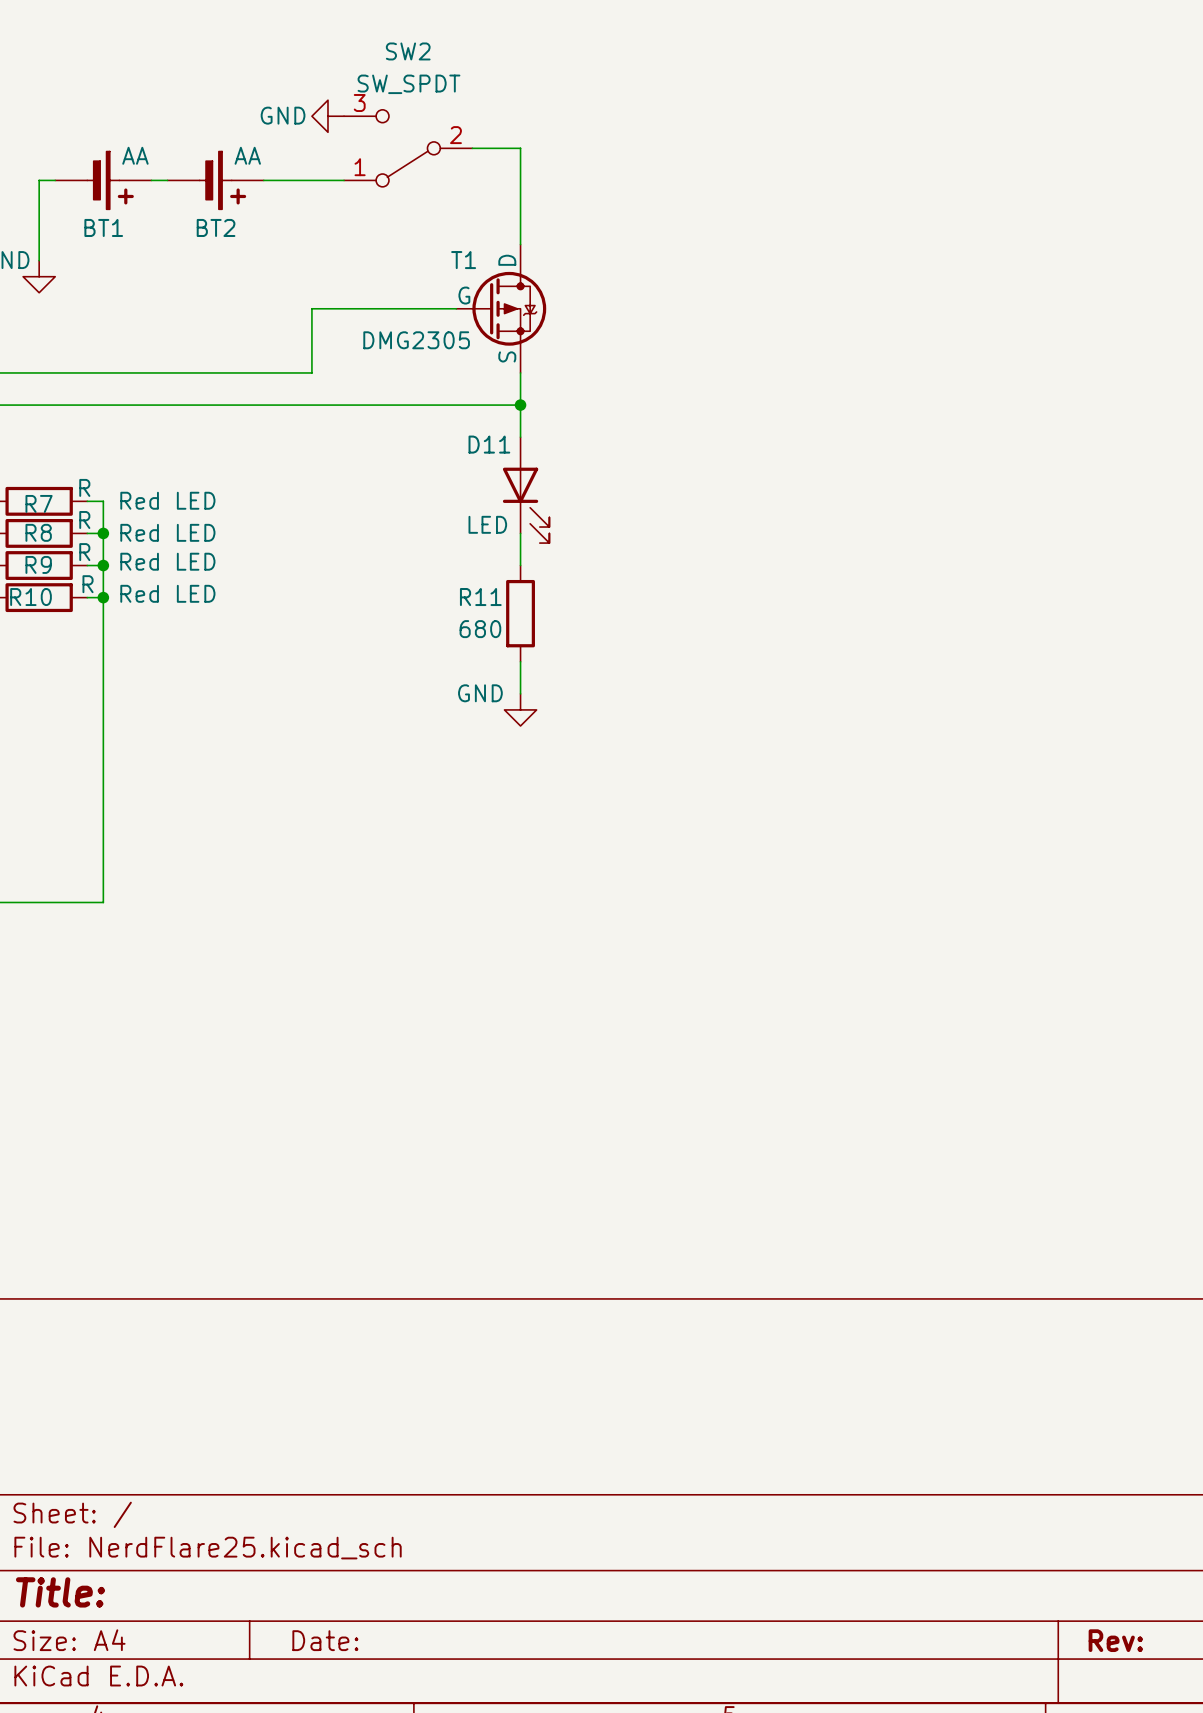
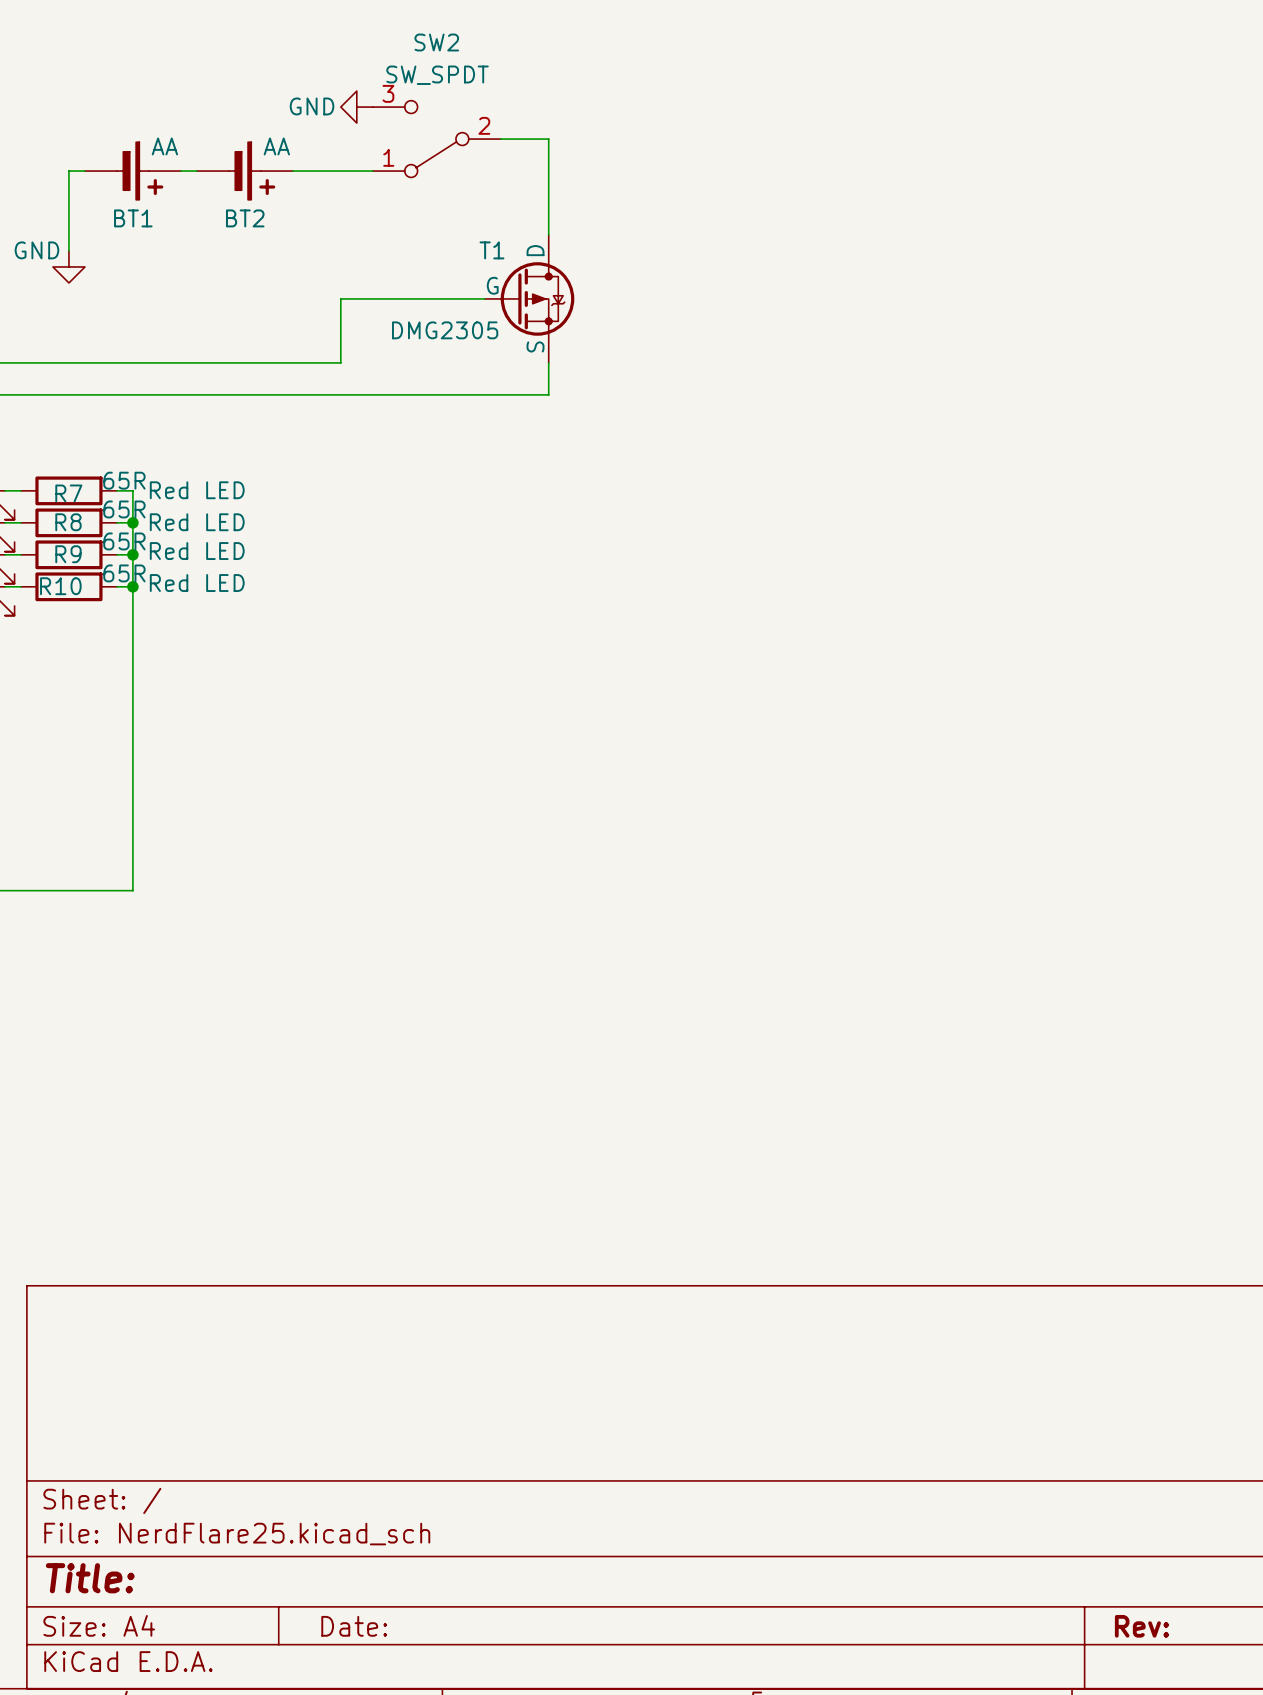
wire: (520, 405) (520, 437) -> none
junction: (520, 405) -> none
R7 value: R (84, 487) -> 65R (124, 480)
D11: LED (526, 490) -> none
R8 value: R (84, 520) -> 65R (124, 509)
wire: (520, 533) (520, 565) -> none
R9 value: R (84, 552) -> 65R (124, 541)
R10 value: R (88, 584) -> 65R (124, 573)
R11: 680 (520, 613) -> none
wire: (520, 661) (520, 693) -> none
power symbol: GND (520, 709) -> none

